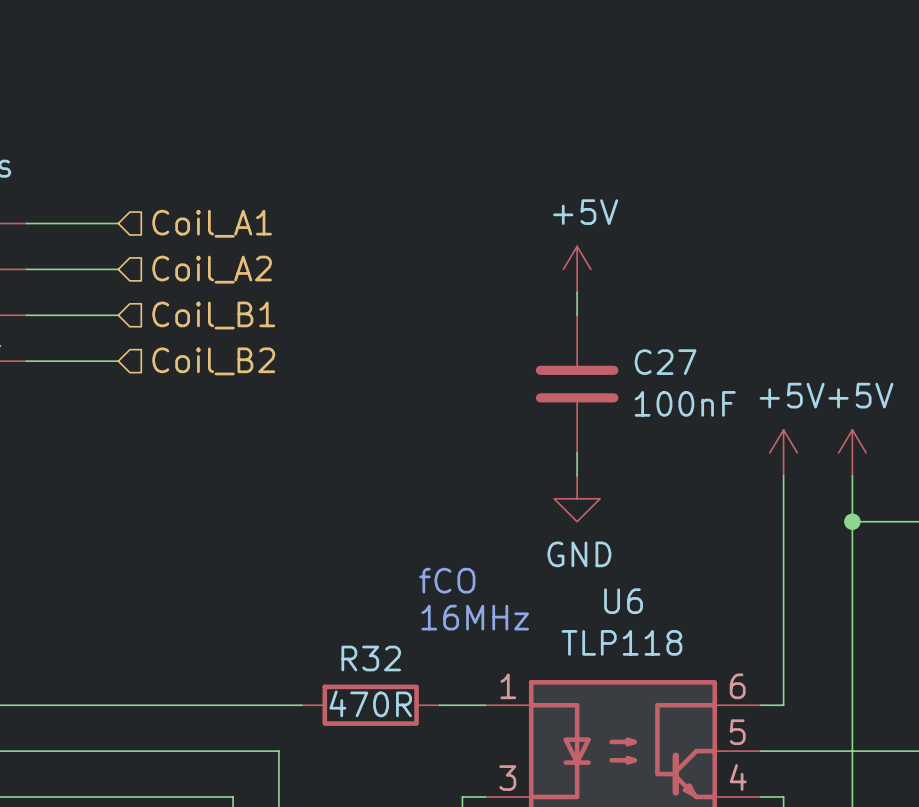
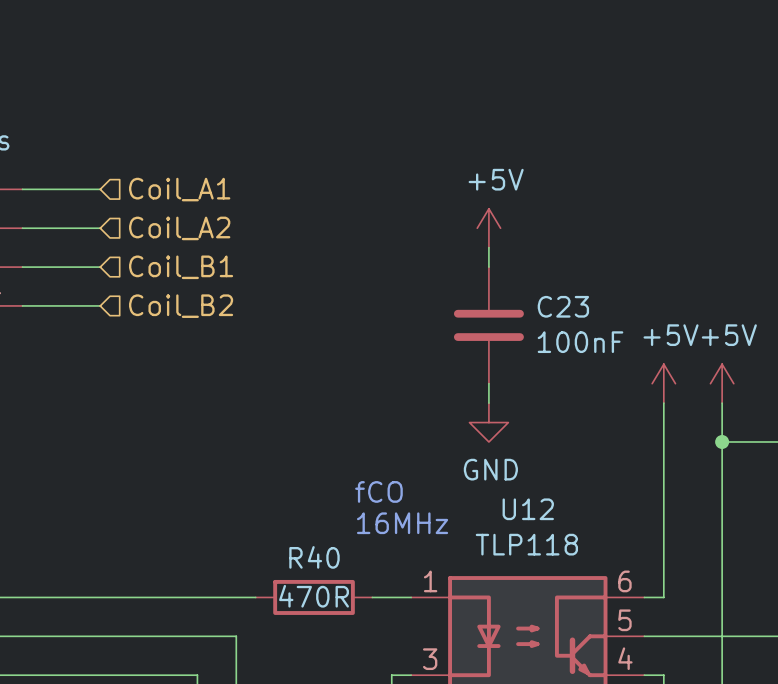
C27 name: C27 (665, 362) -> C23 (563, 306)
U6 name: U6 (623, 601) -> U12 (528, 509)
R32 name: R32 (371, 658) -> R40 (314, 557)

